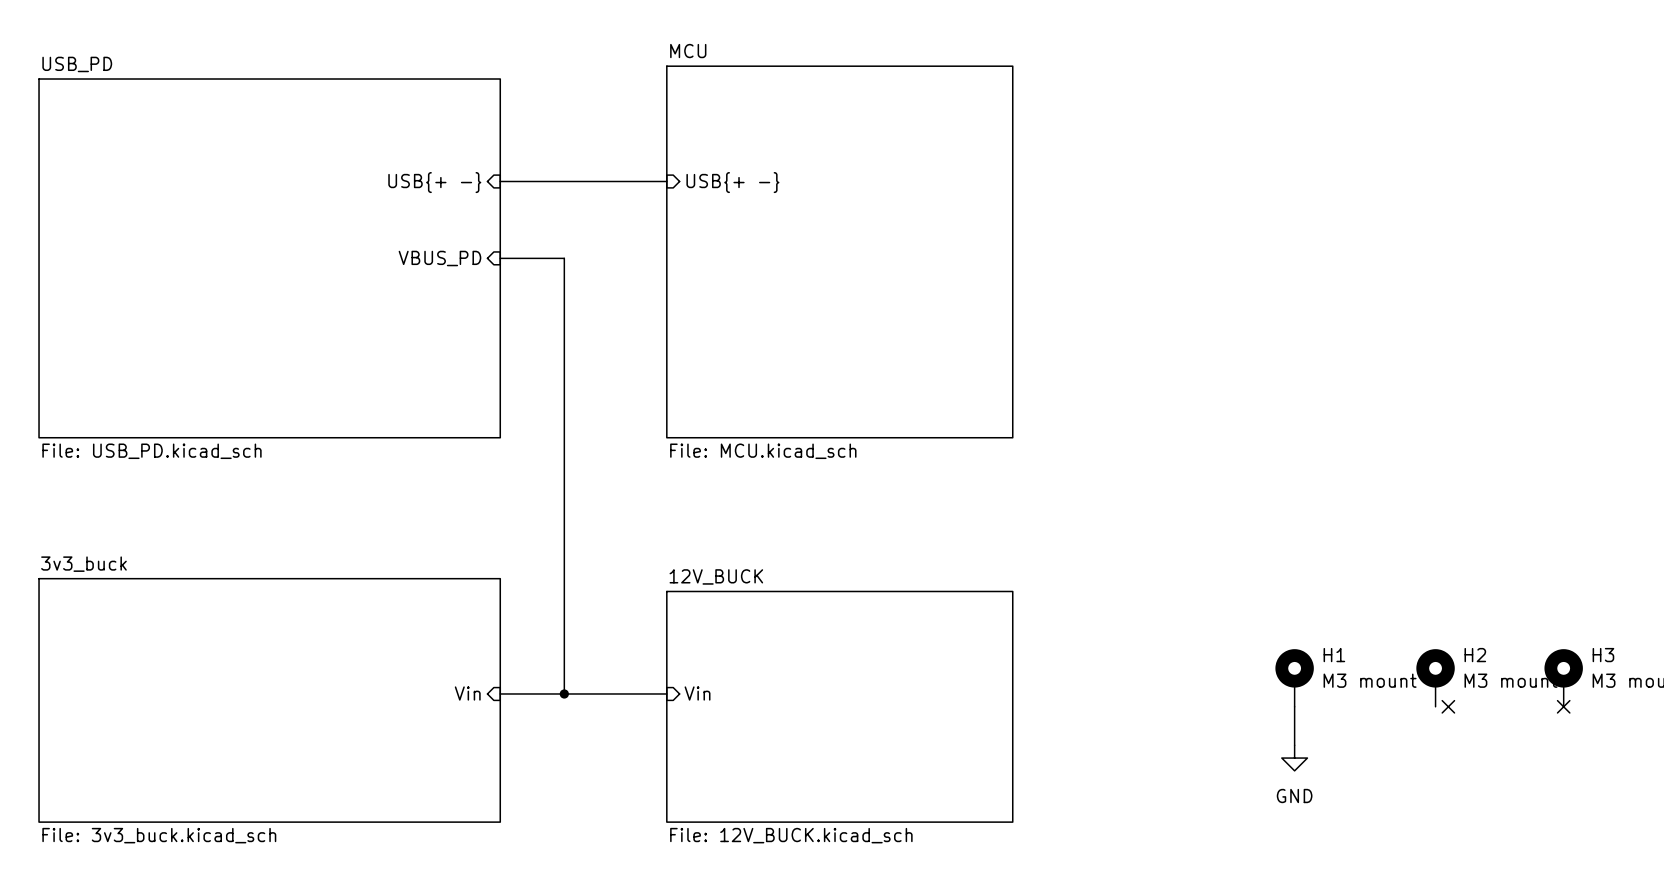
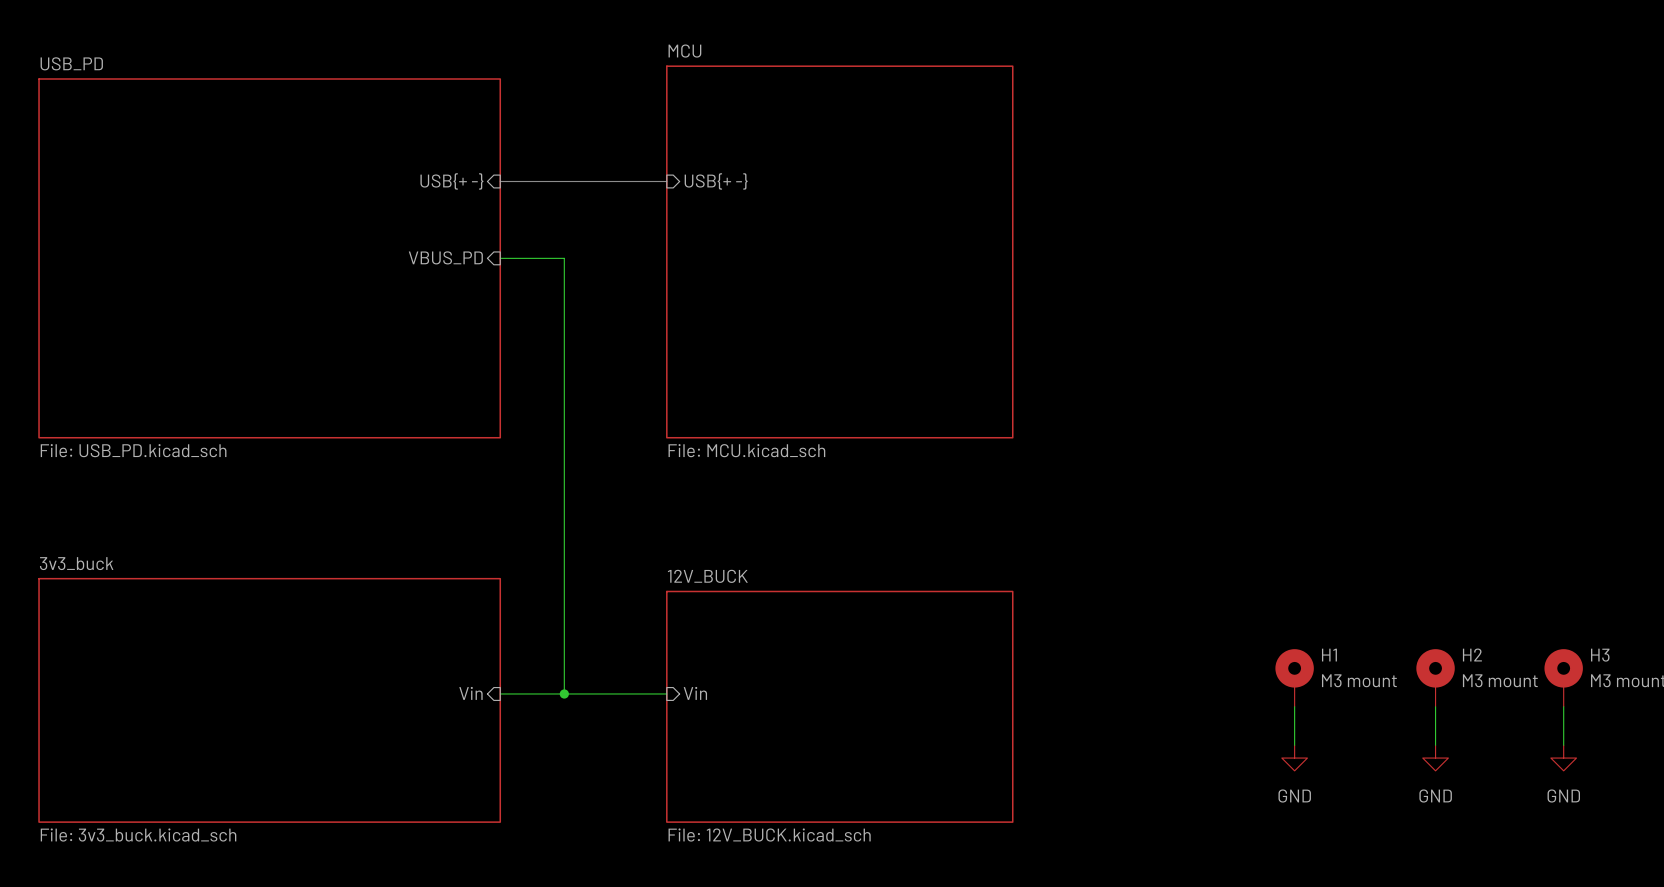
wire: none -> (1435, 706) (1435, 745)
no-connect mark: (1448, 706) -> none
wire: none -> (1563, 706) (1563, 745)
no-connect mark: (1563, 706) -> none
power symbol: none -> GND (1435, 758)
power symbol: none -> GND (1563, 758)

